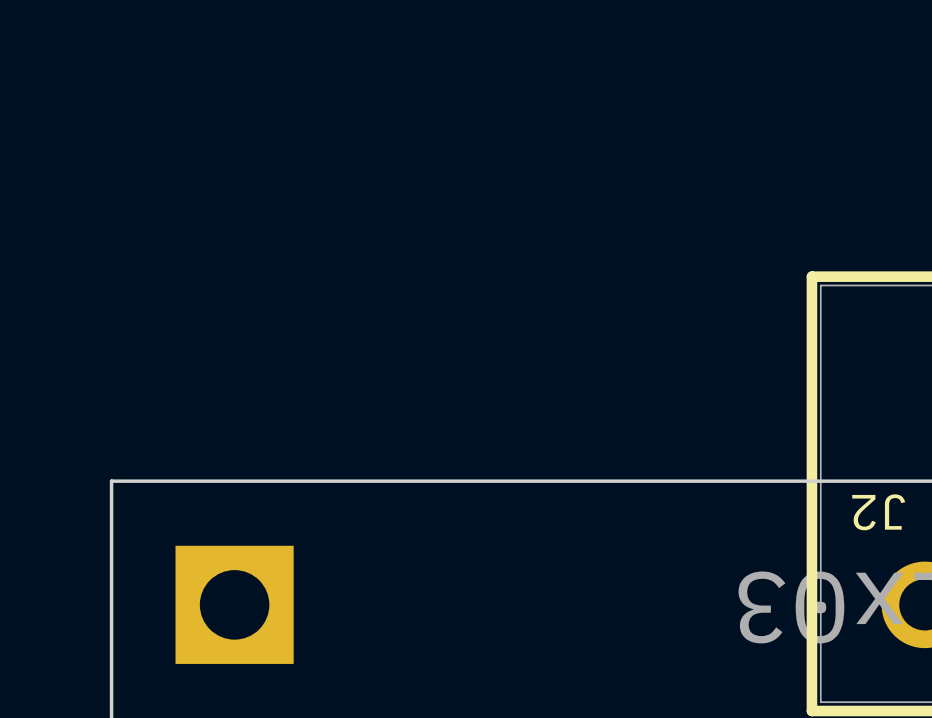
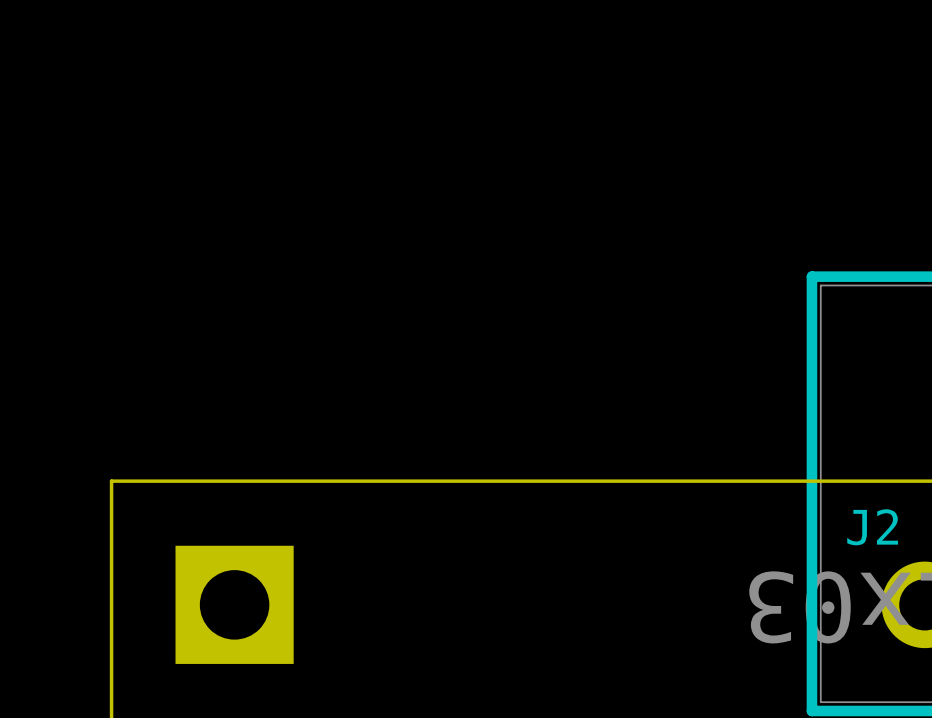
J2 name rotation: 0° (878, 512) -> 180° (872, 527)

